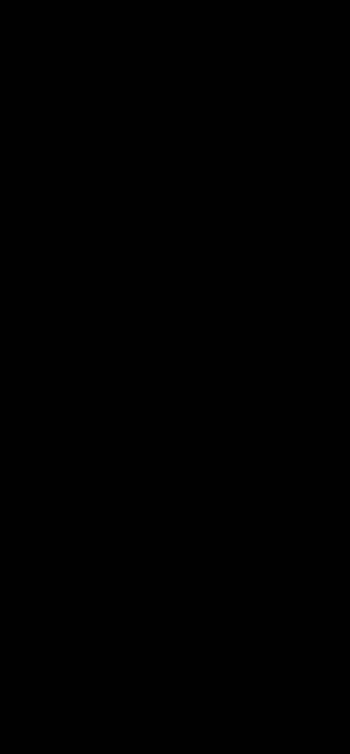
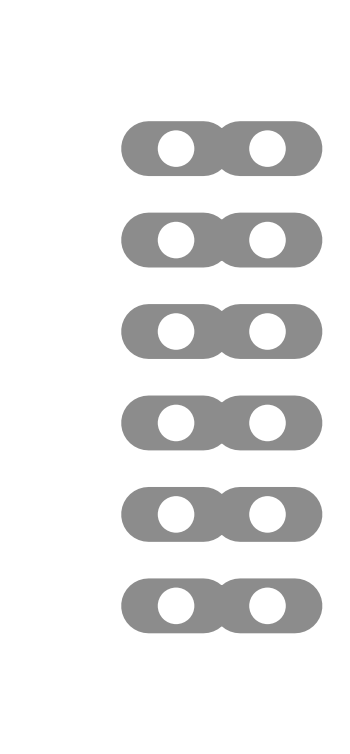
part: none -> (176, 377)
part: none -> (267, 377)

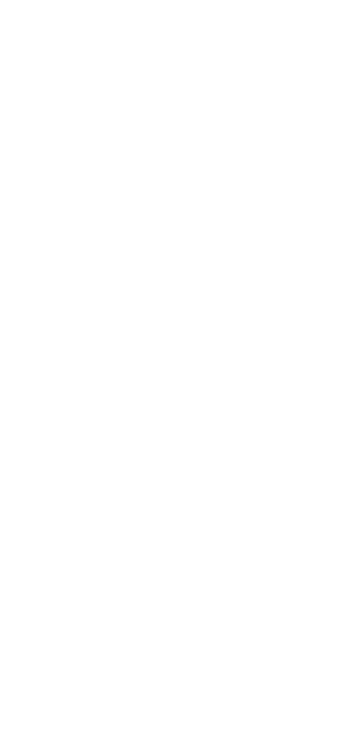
part: (176, 377) -> none
part: (267, 377) -> none

